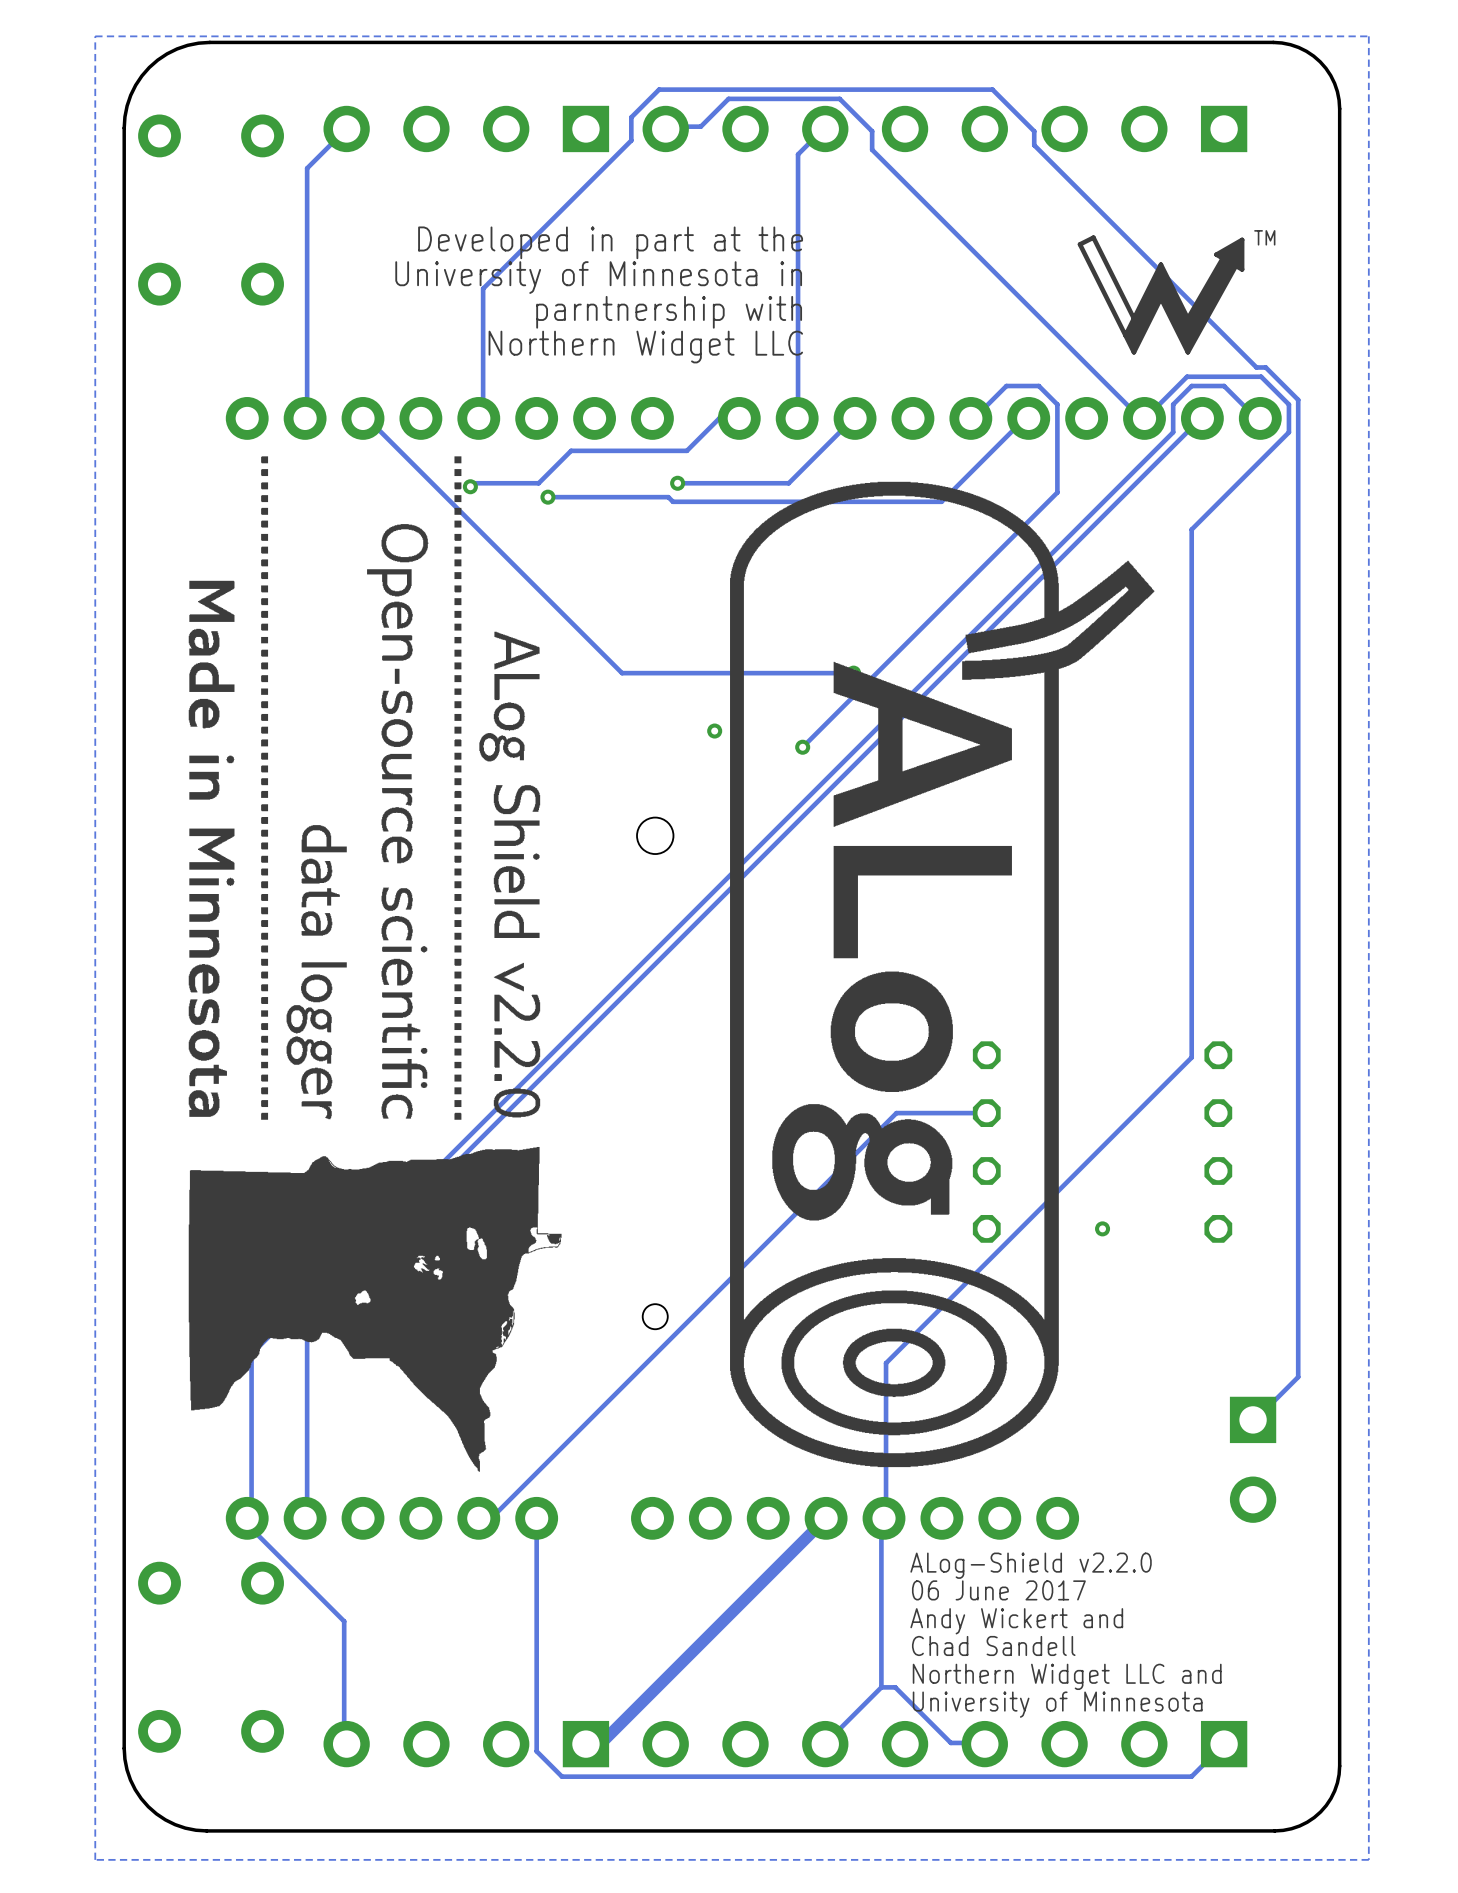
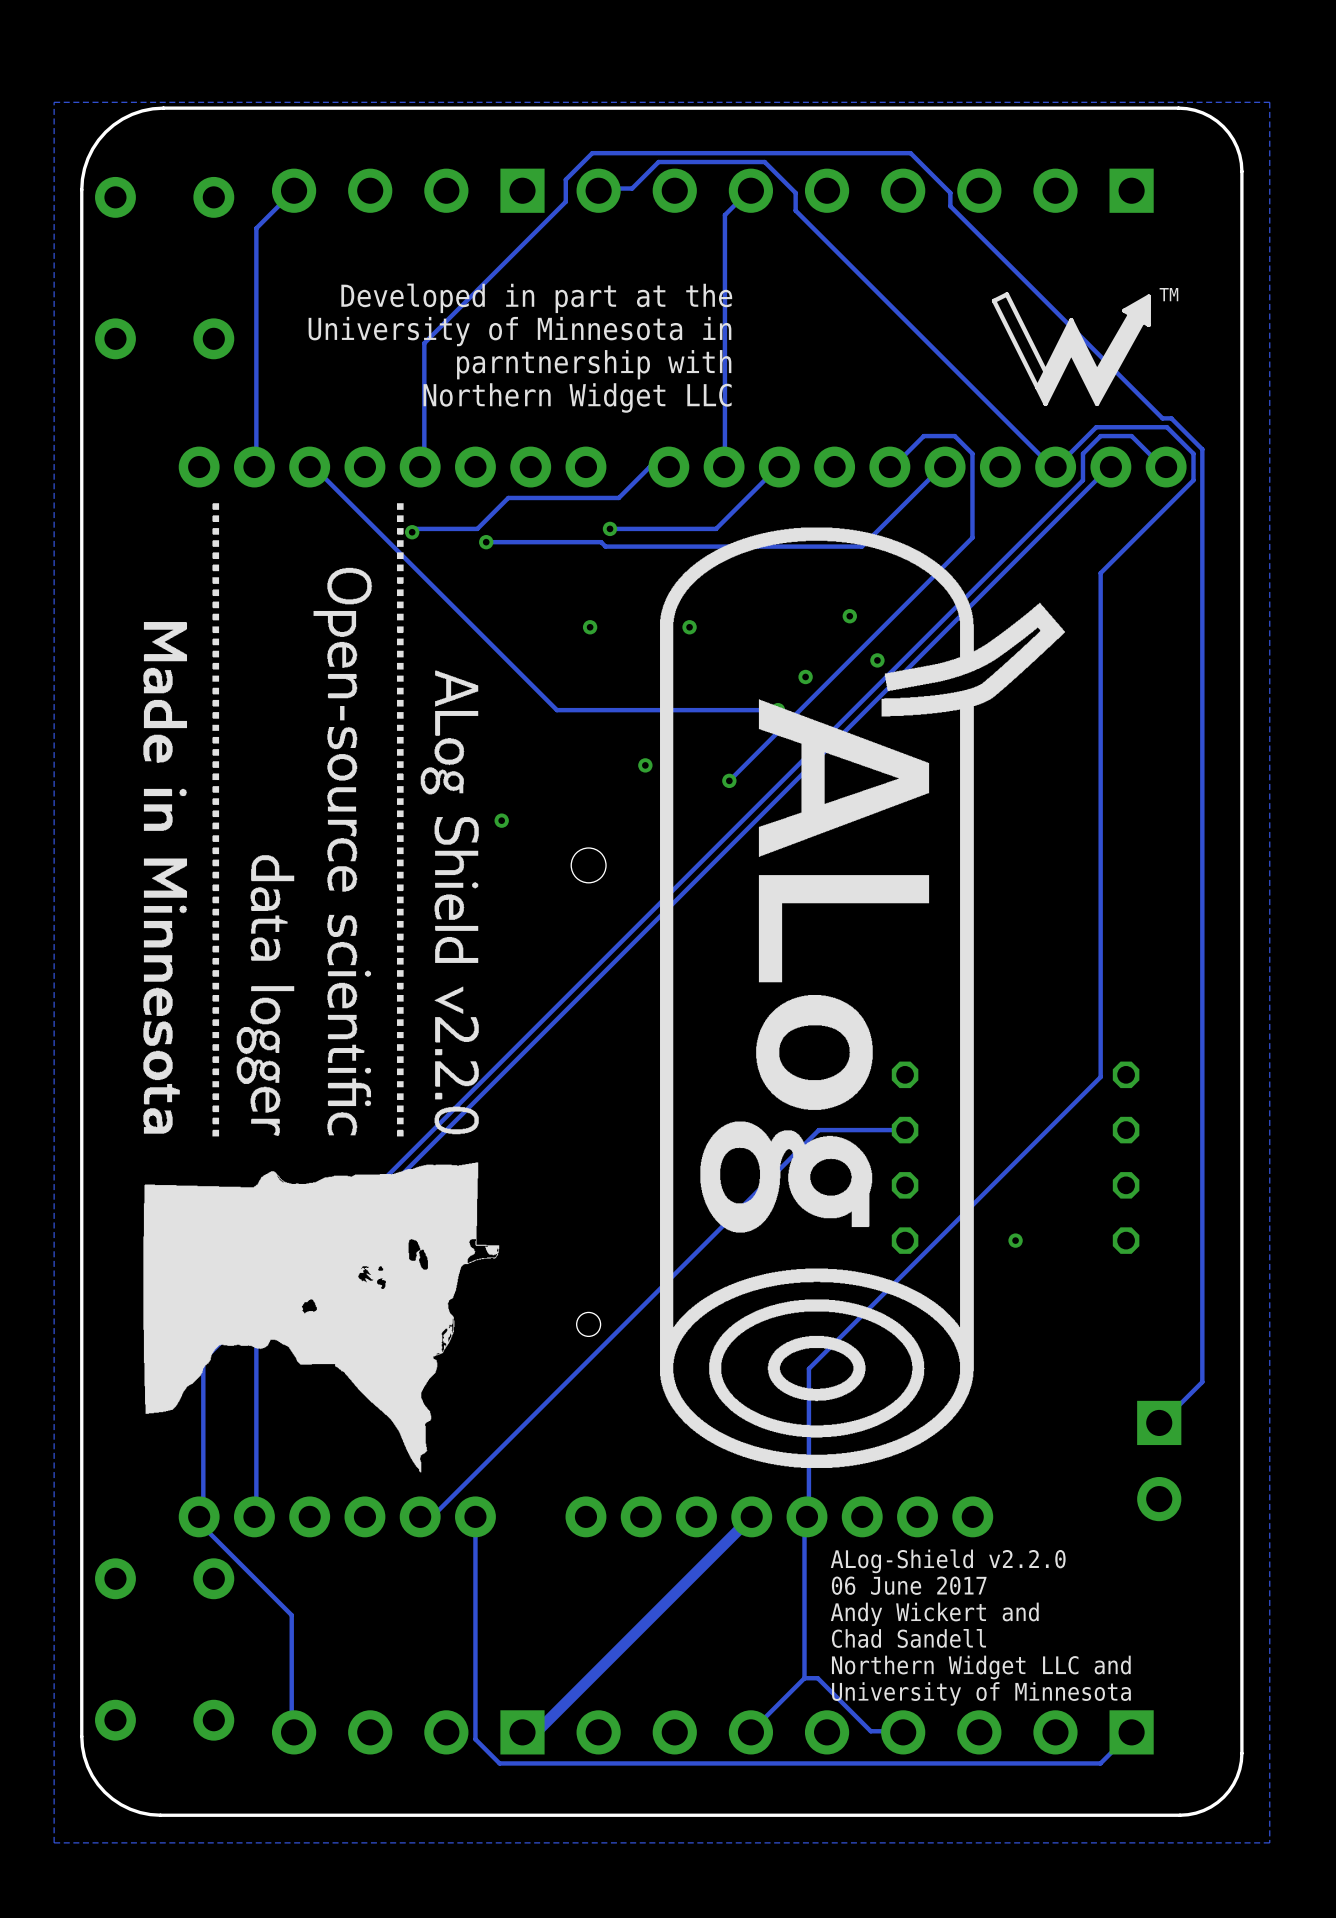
via: none -> (849, 616)
via: none -> (590, 627)
via: none -> (689, 627)
via: none -> (877, 660)
via: none -> (805, 676)
via: none -> (501, 820)

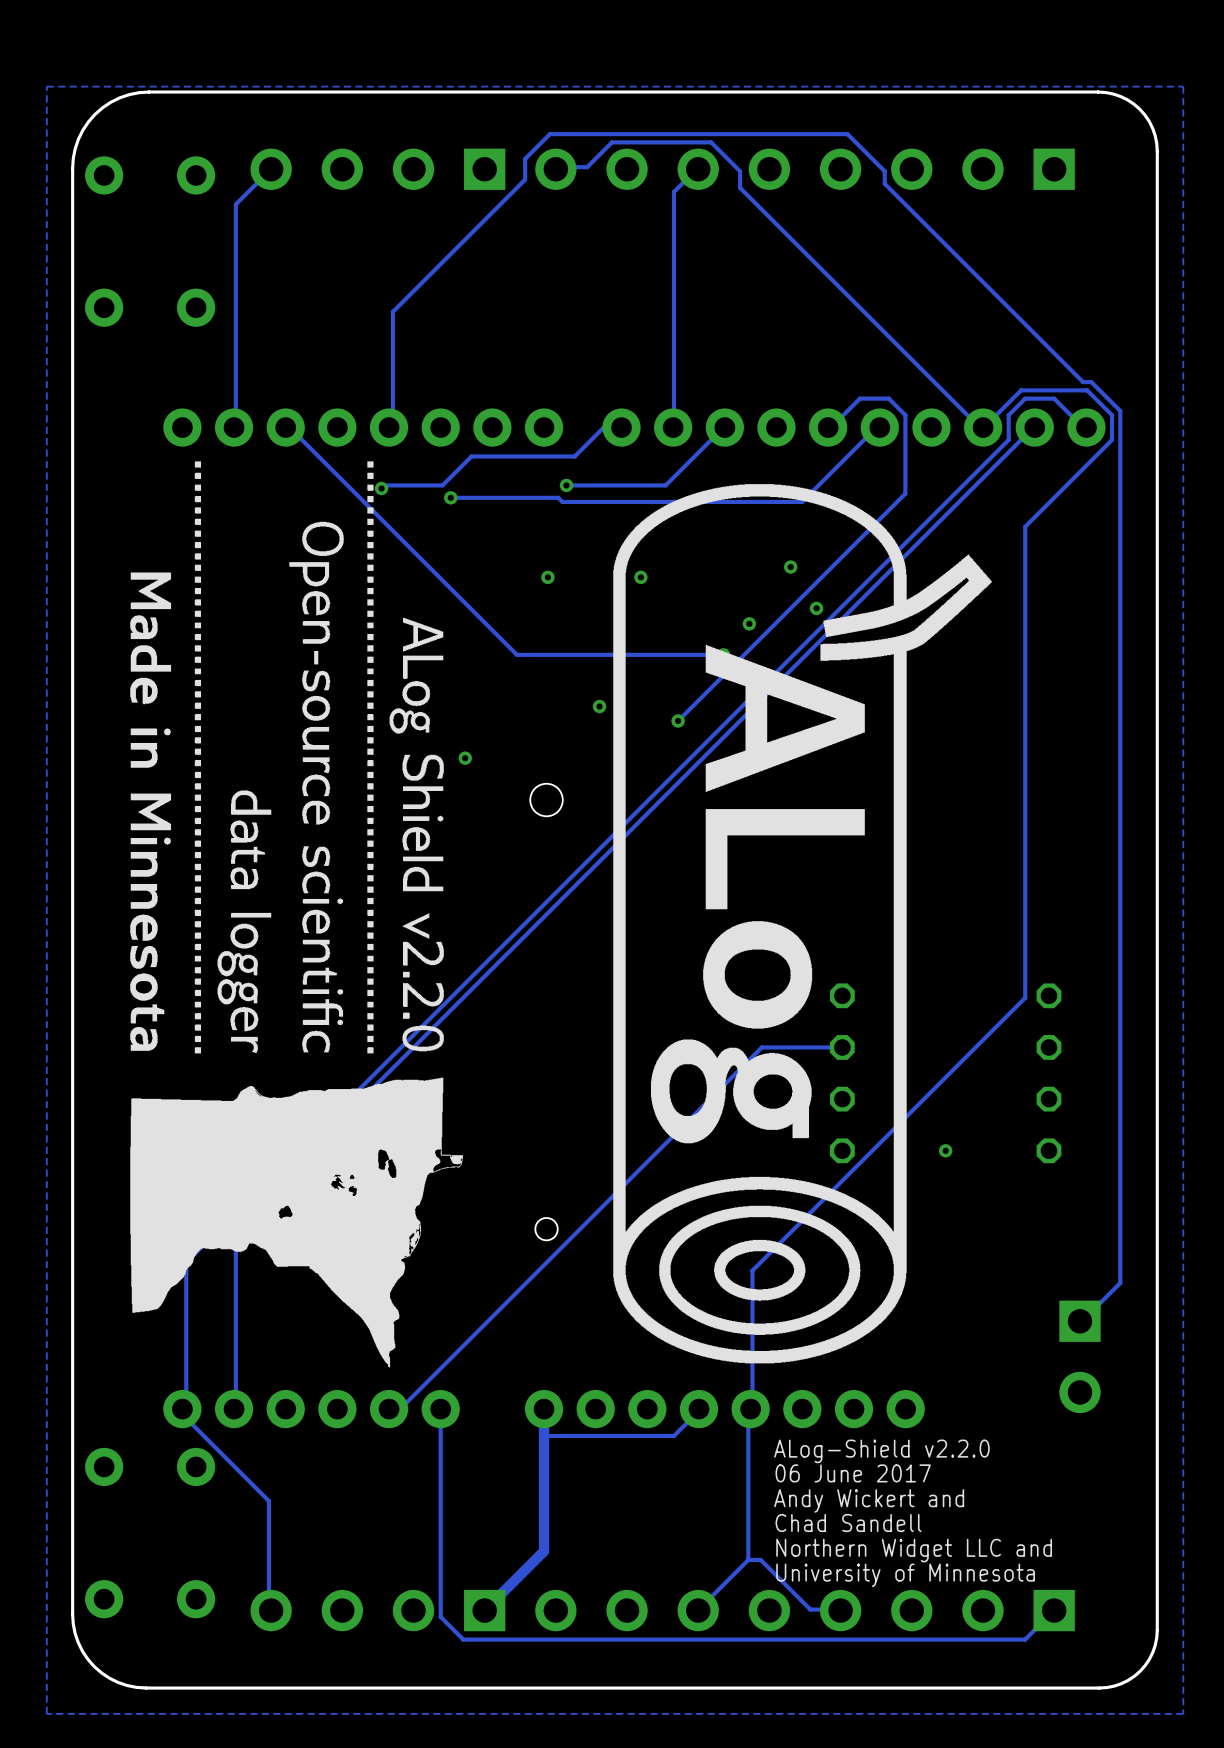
drawing: [991, 292, 1152, 407] -> none
text: TM (1168, 294) -> none
text: Developed in part at the (536, 298) -> none
text: University of Minnesota in (519, 331) -> none
text: parntnership with (594, 364) -> none
text: Northern Widget LLC (577, 397) -> none
track: (751, 1516) (536, 1732) (522, 1732) -> (544, 1409) (544, 1551) (484, 1610)
track: none -> (699, 1409) (673, 1435) (544, 1435)

